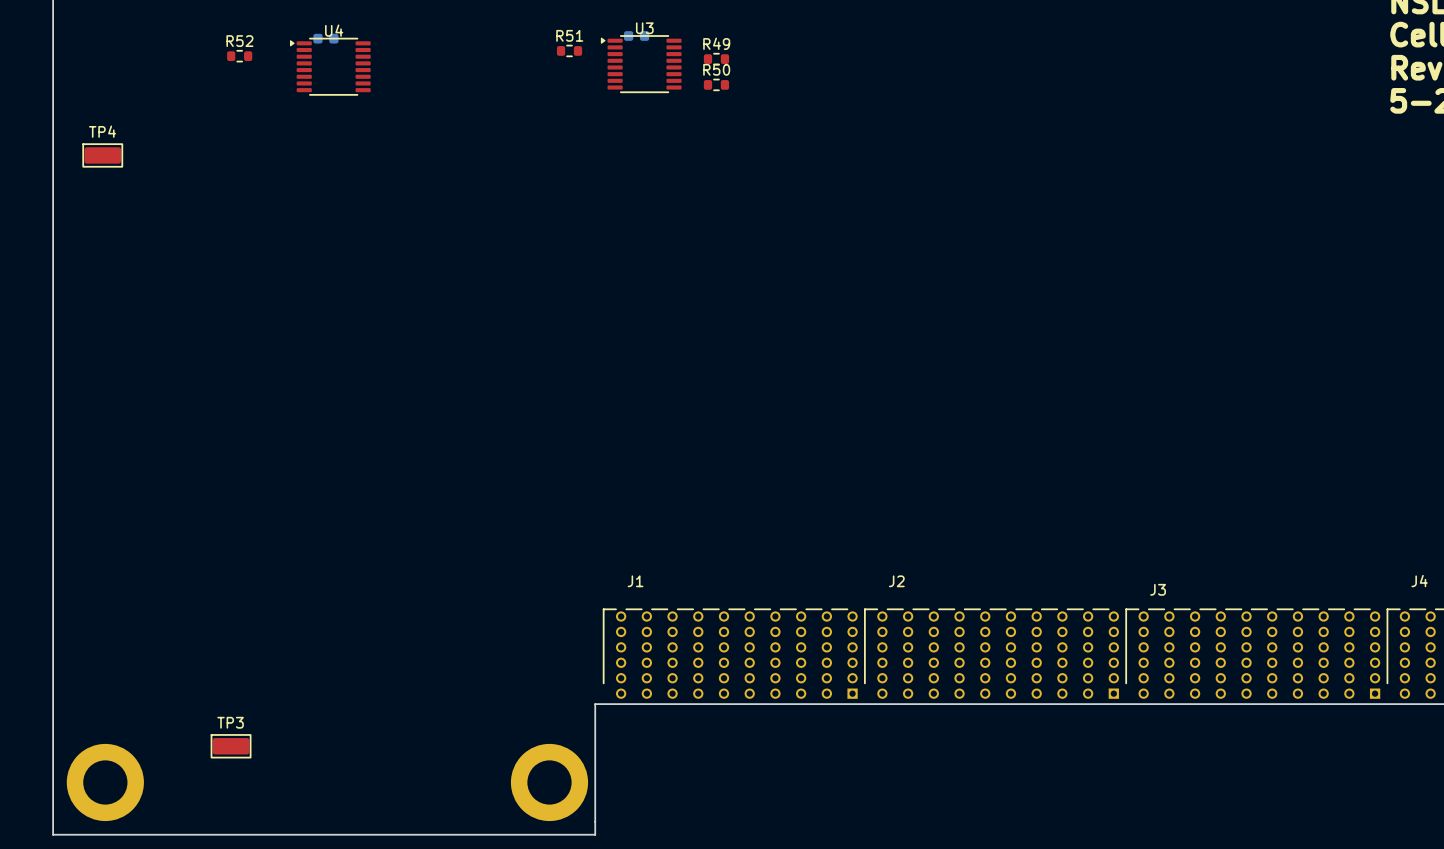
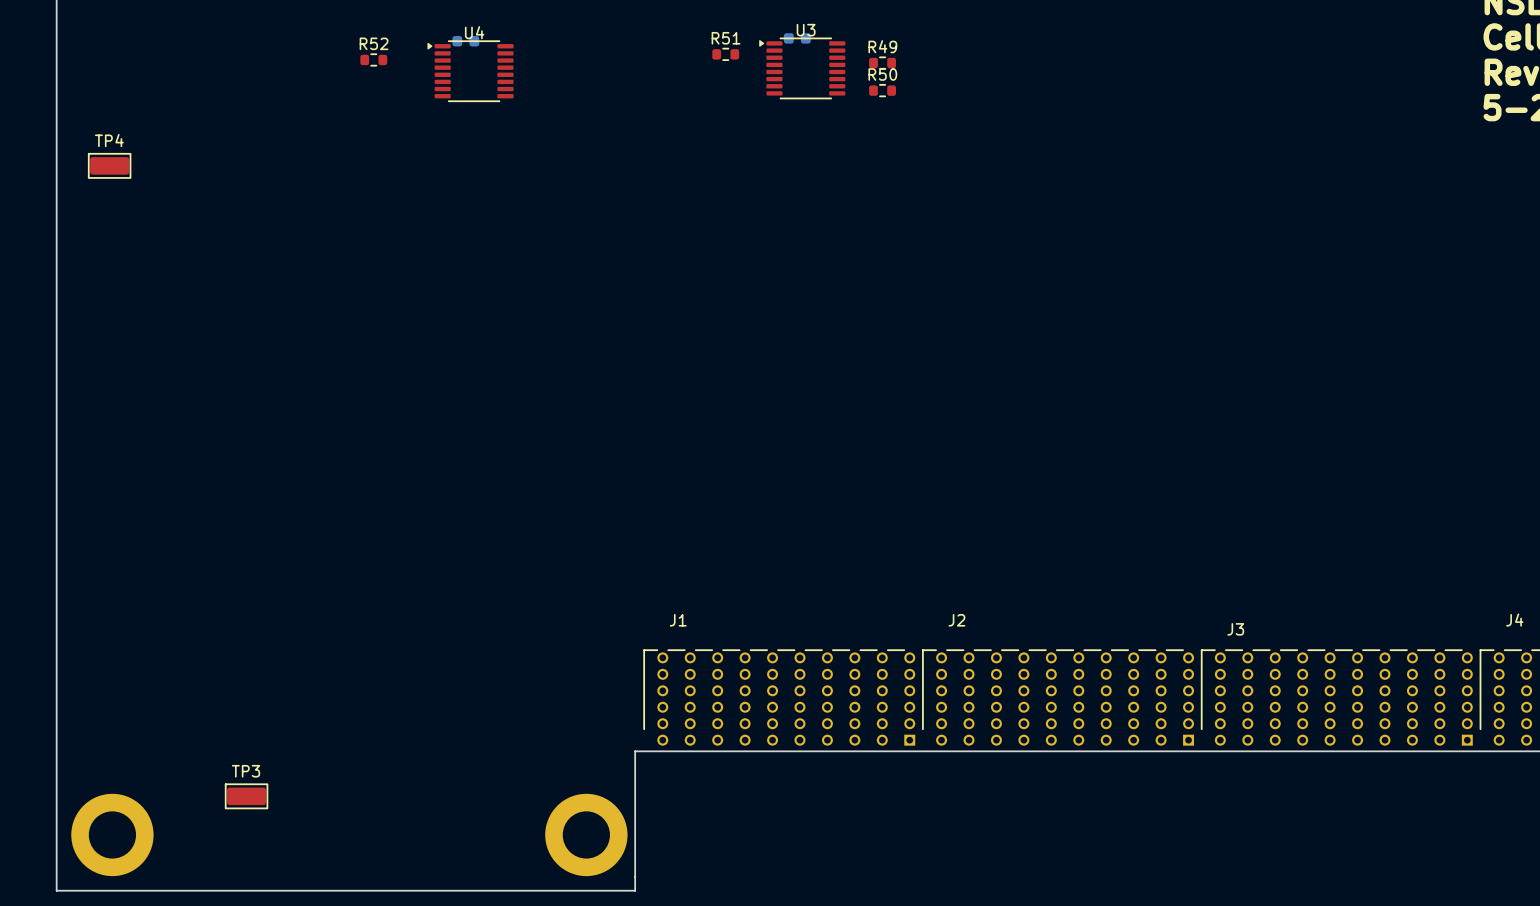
part: (636, 35) -> none
part: none -> (797, 38)
part: (325, 38) -> none
part: none -> (465, 41)
R51 position: (569, 50) -> (725, 54)
R52 position: (239, 56) -> (373, 59)
R49 position: (716, 59) -> (882, 63)
U3 position: (641, 64) -> (802, 68)
U4 position: (330, 66) -> (470, 71)
R50 position: (716, 84) -> (882, 90)

